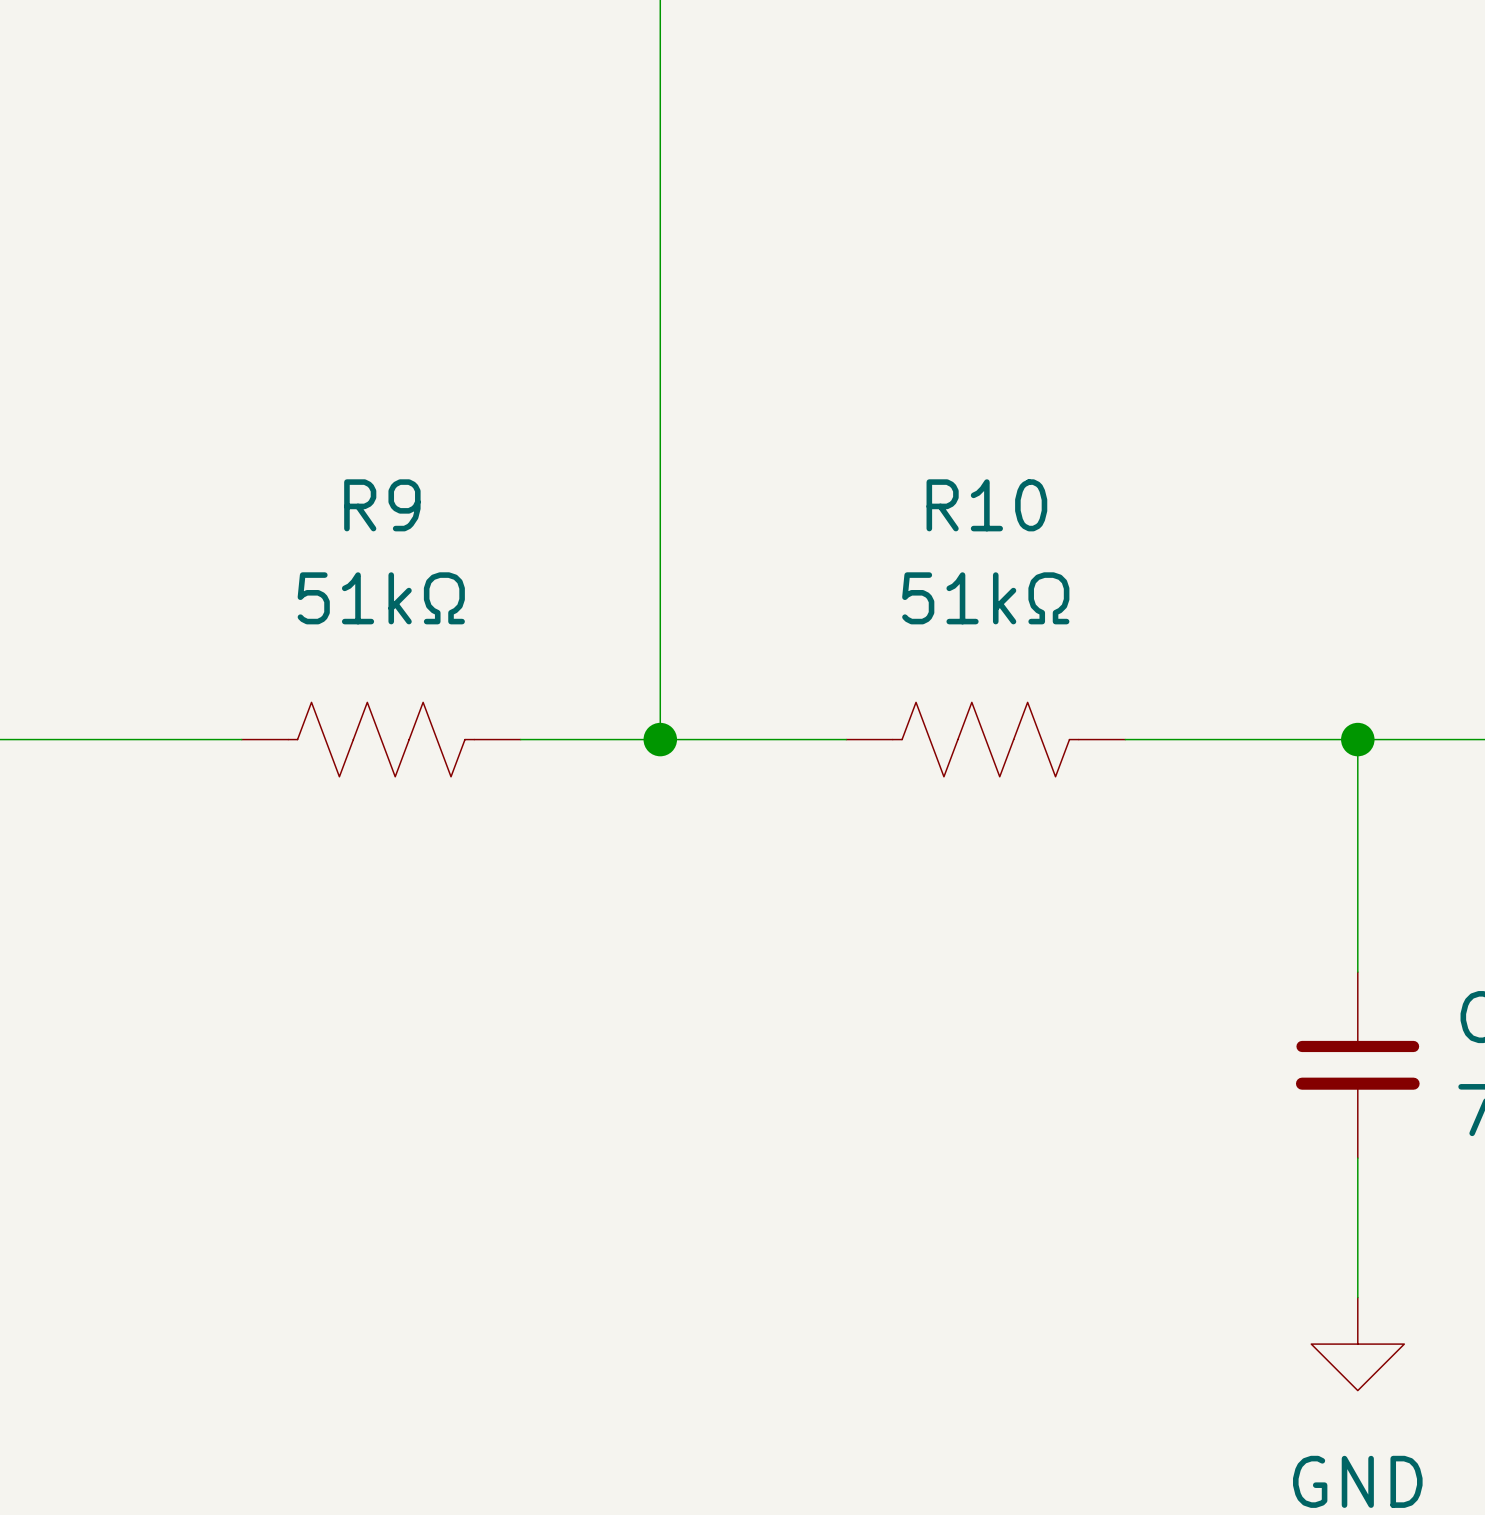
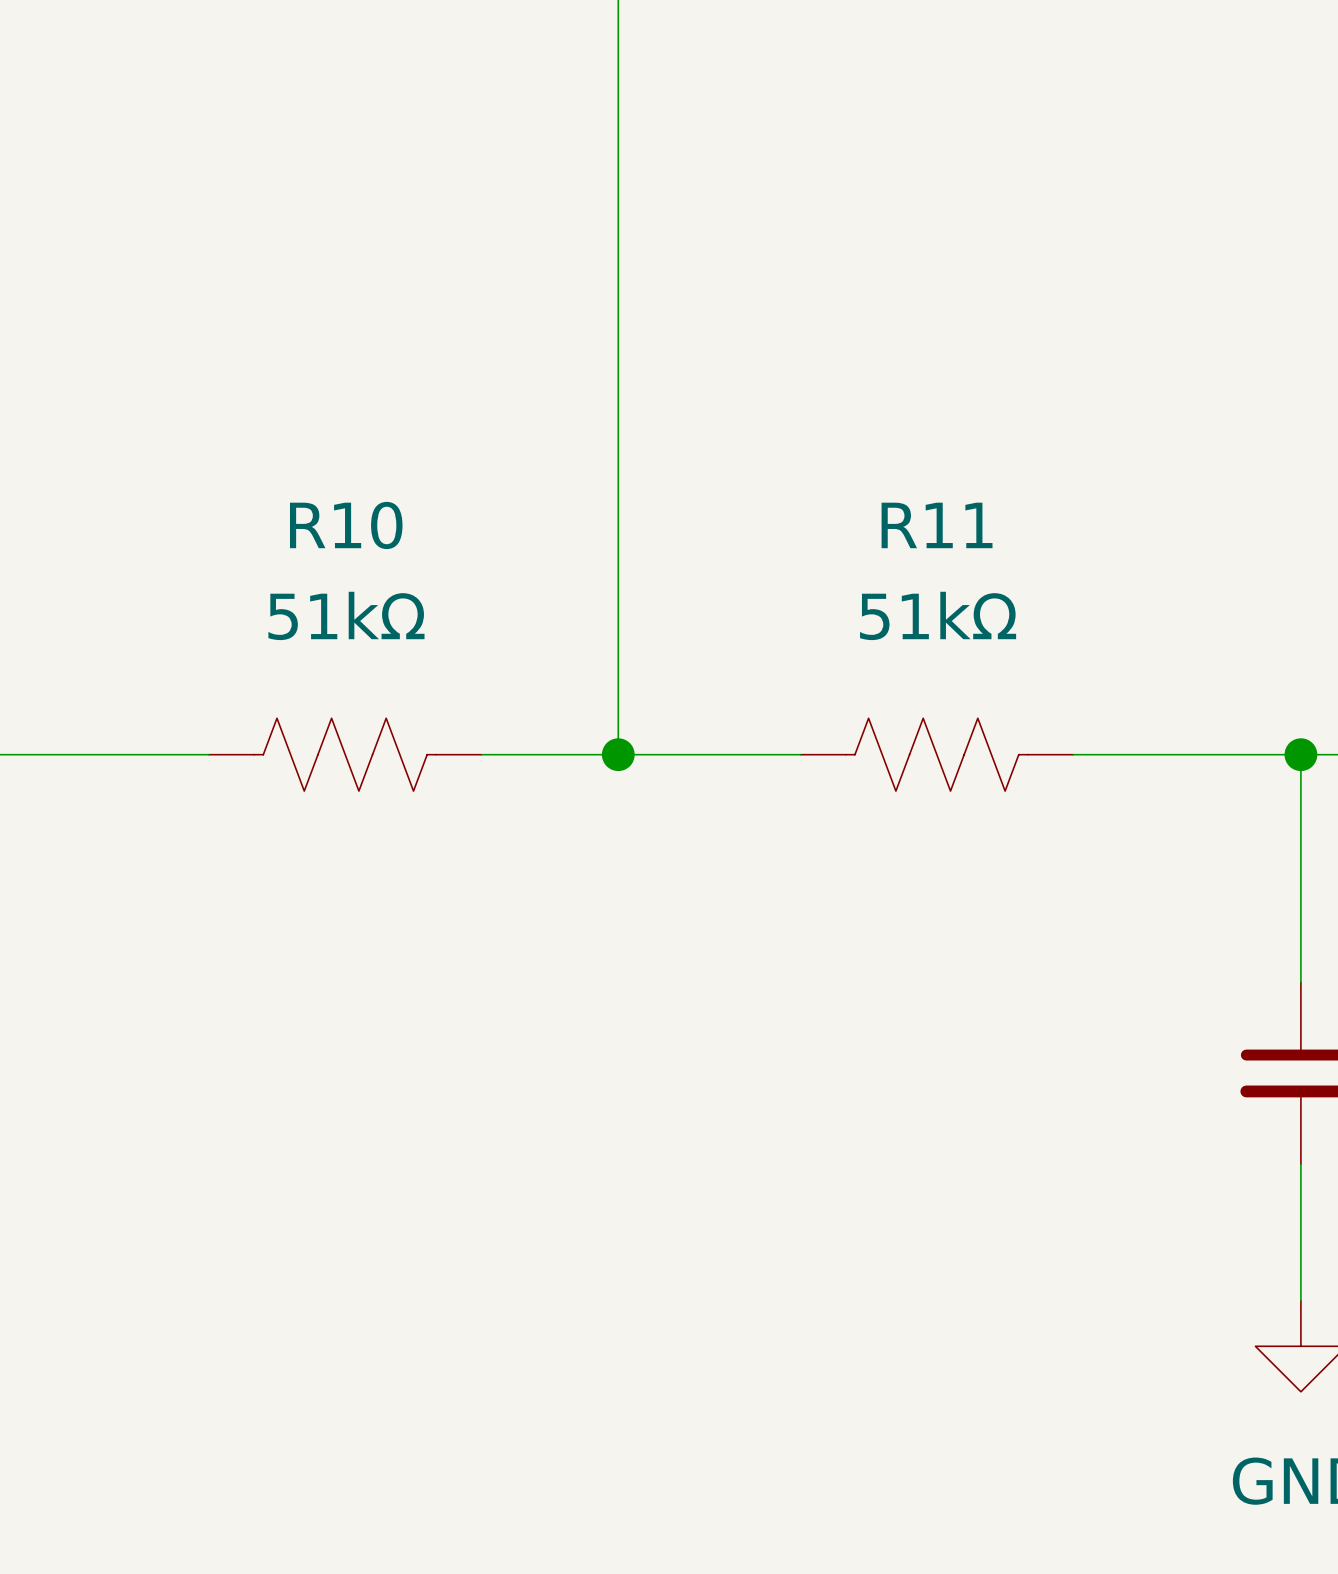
R9 name: R9 (382, 505) -> R10 (346, 525)
R10 name: R10 (986, 505) -> R11 (937, 525)

